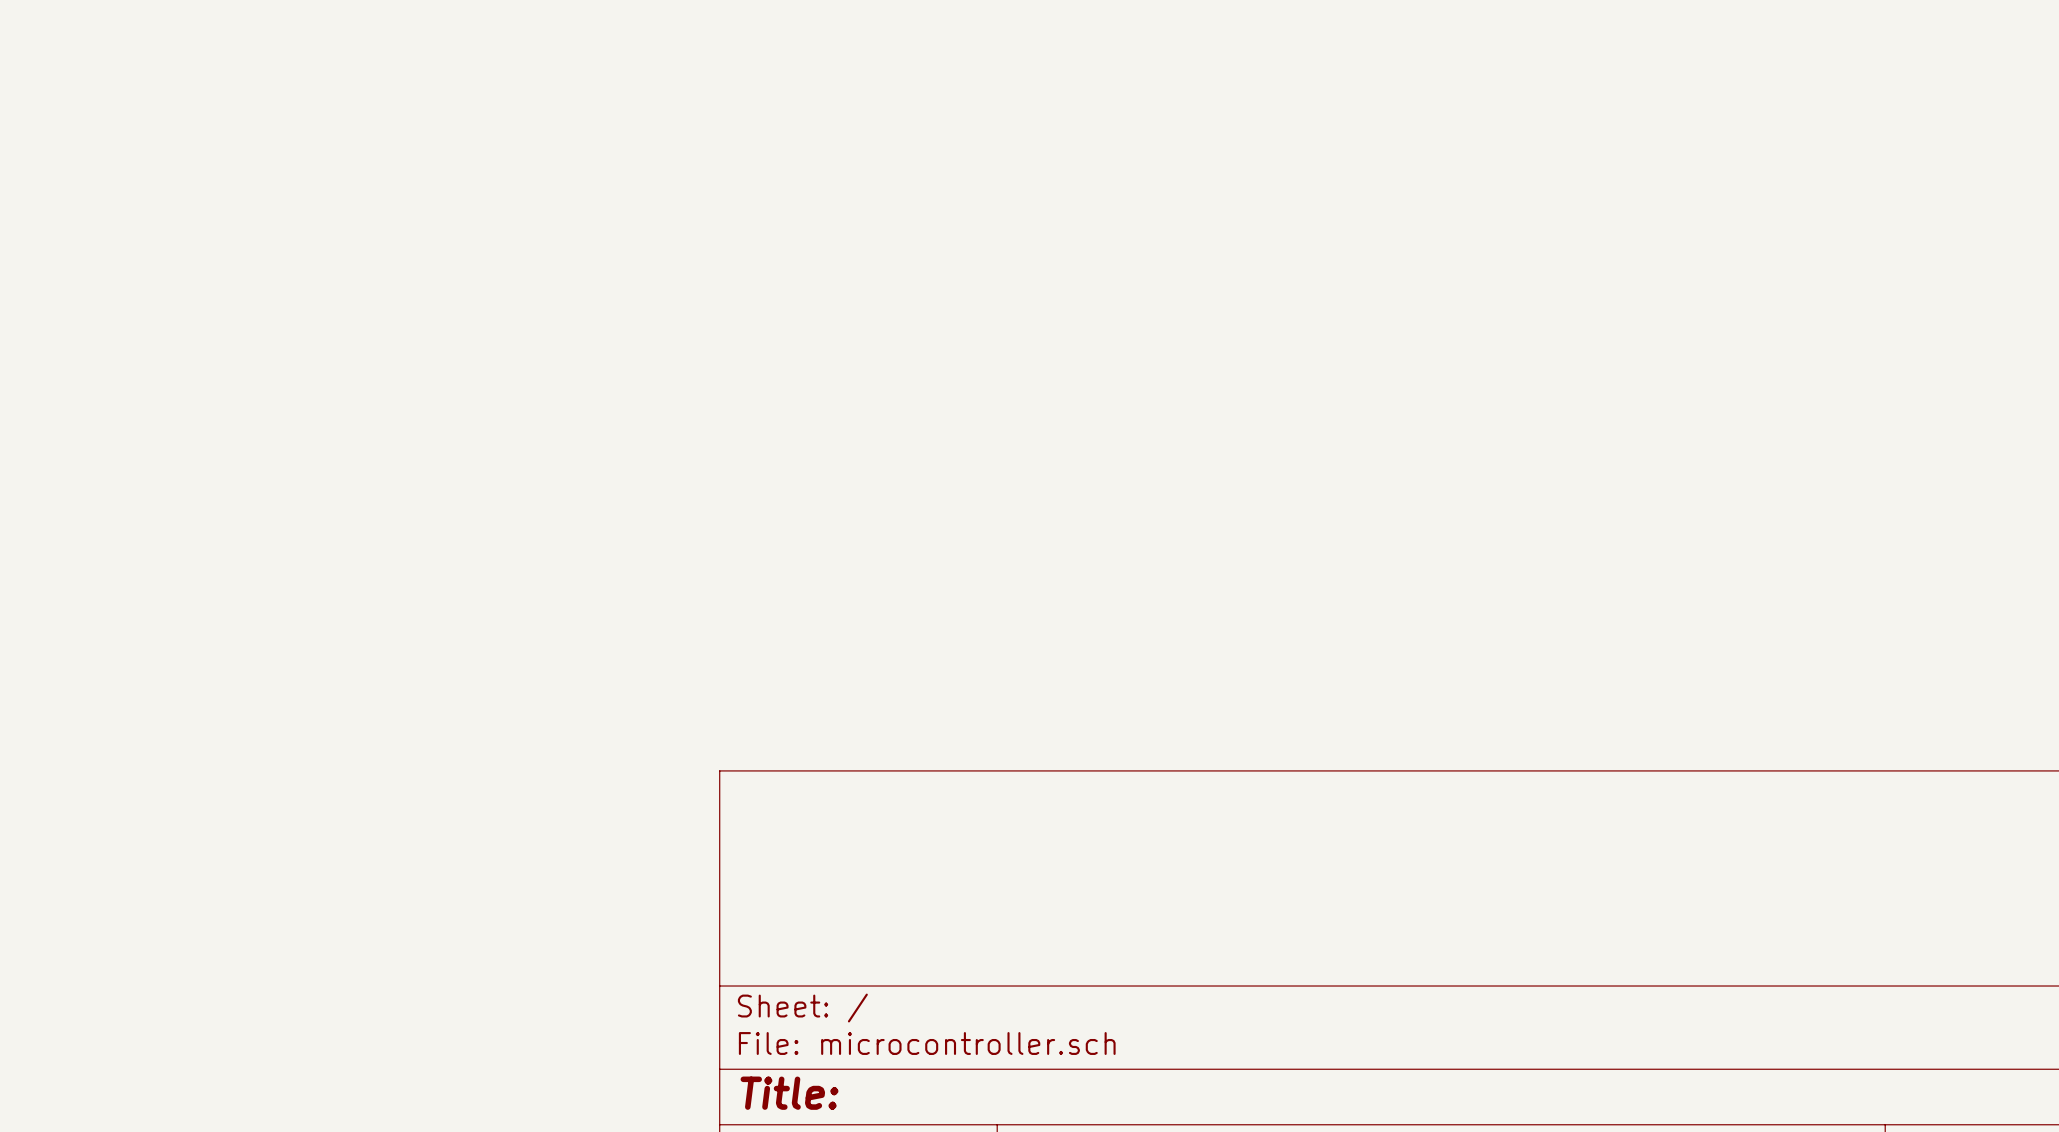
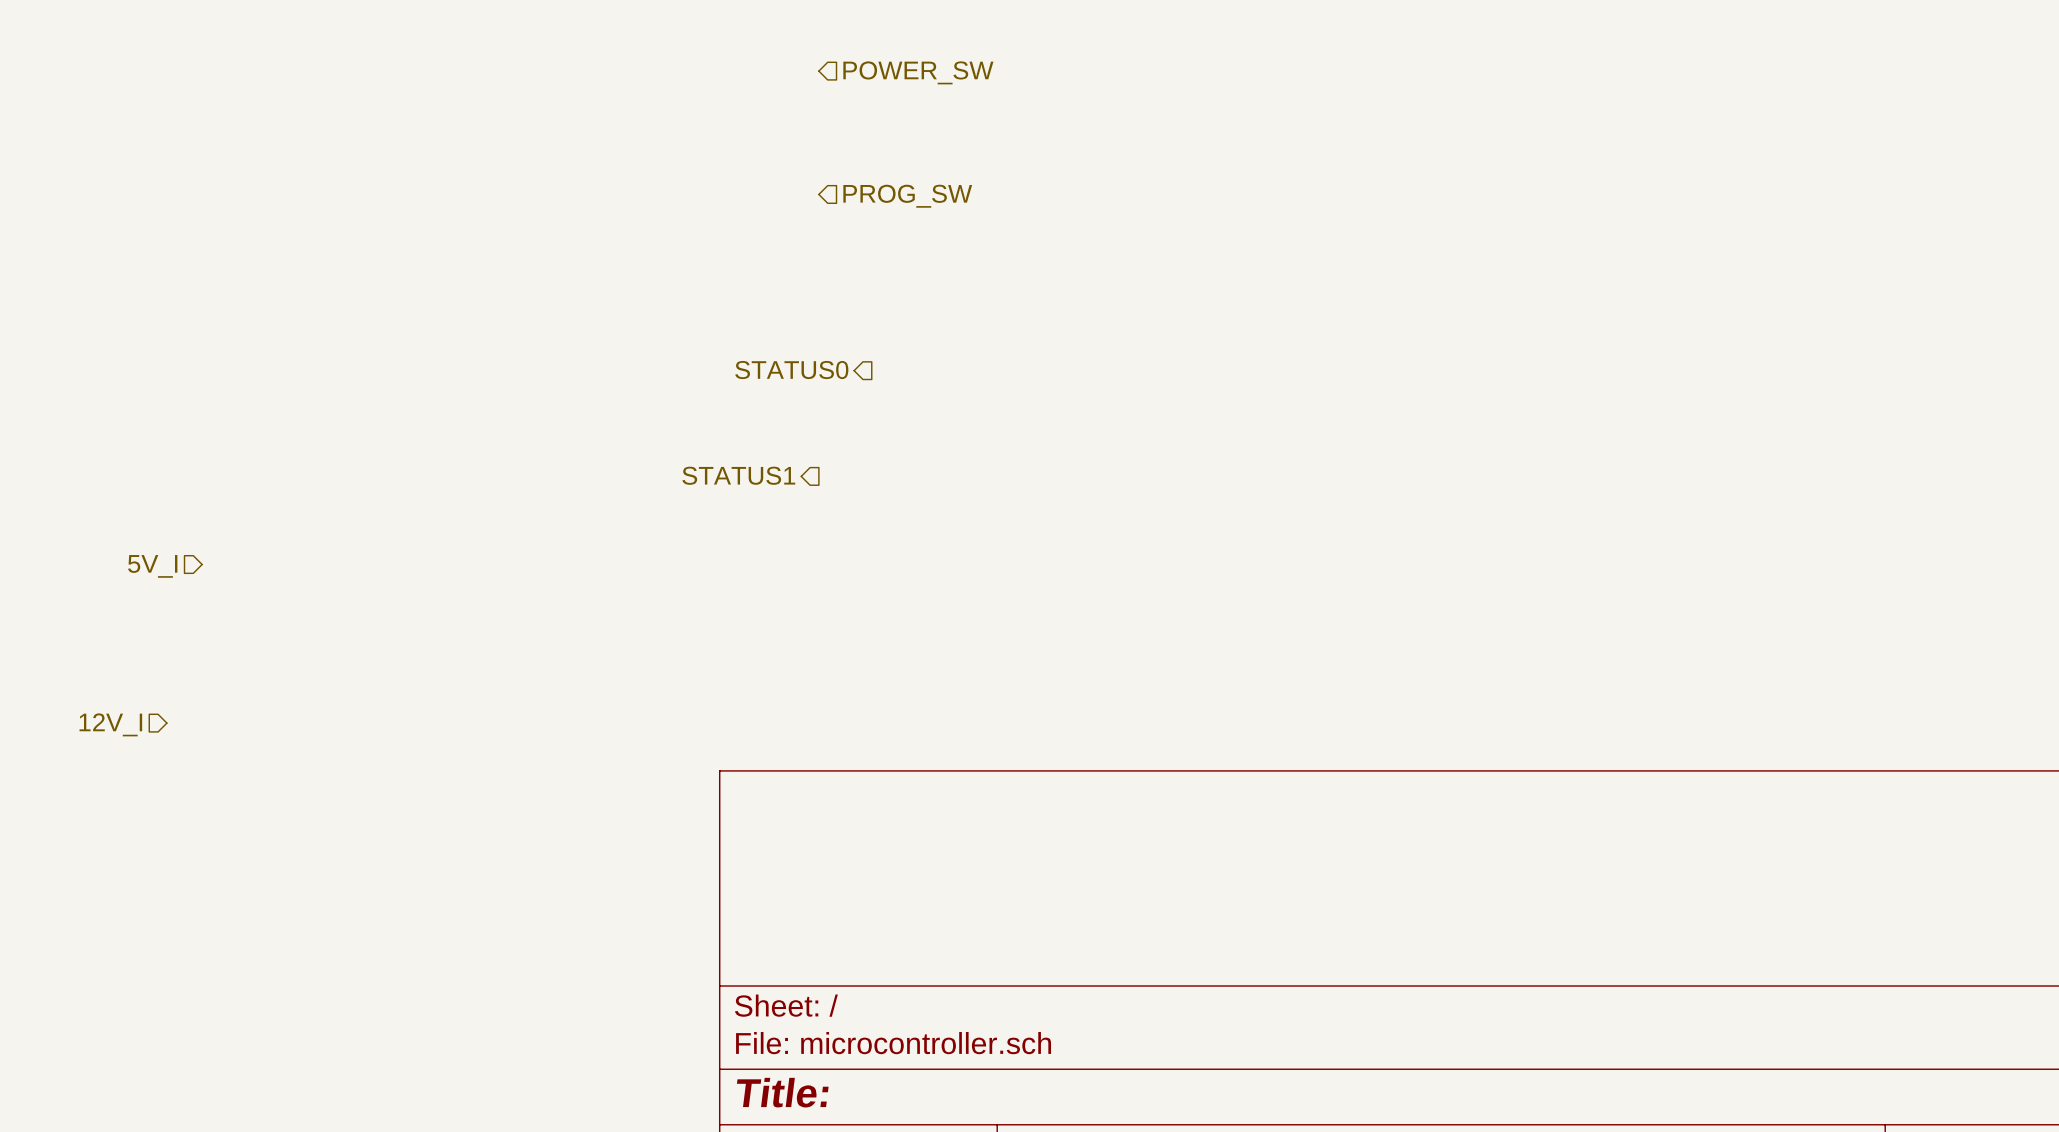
hierarchical label: none -> POWER_SW (918, 72)
hierarchical label: none -> PROG_SW (907, 196)
hierarchical label: none -> STATUS0 (791, 370)
hierarchical label: none -> STATUS1 (738, 475)
hierarchical label: none -> 5V_I (152, 566)
hierarchical label: none -> 12V_I (110, 724)

